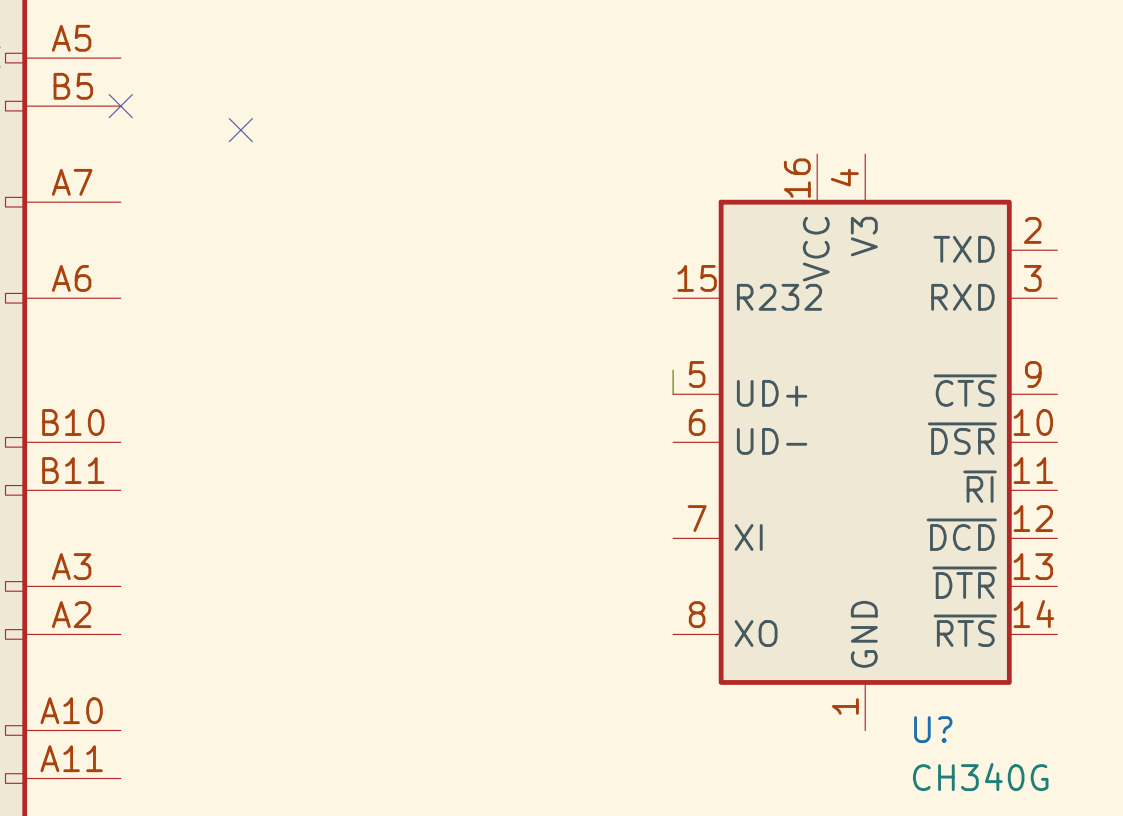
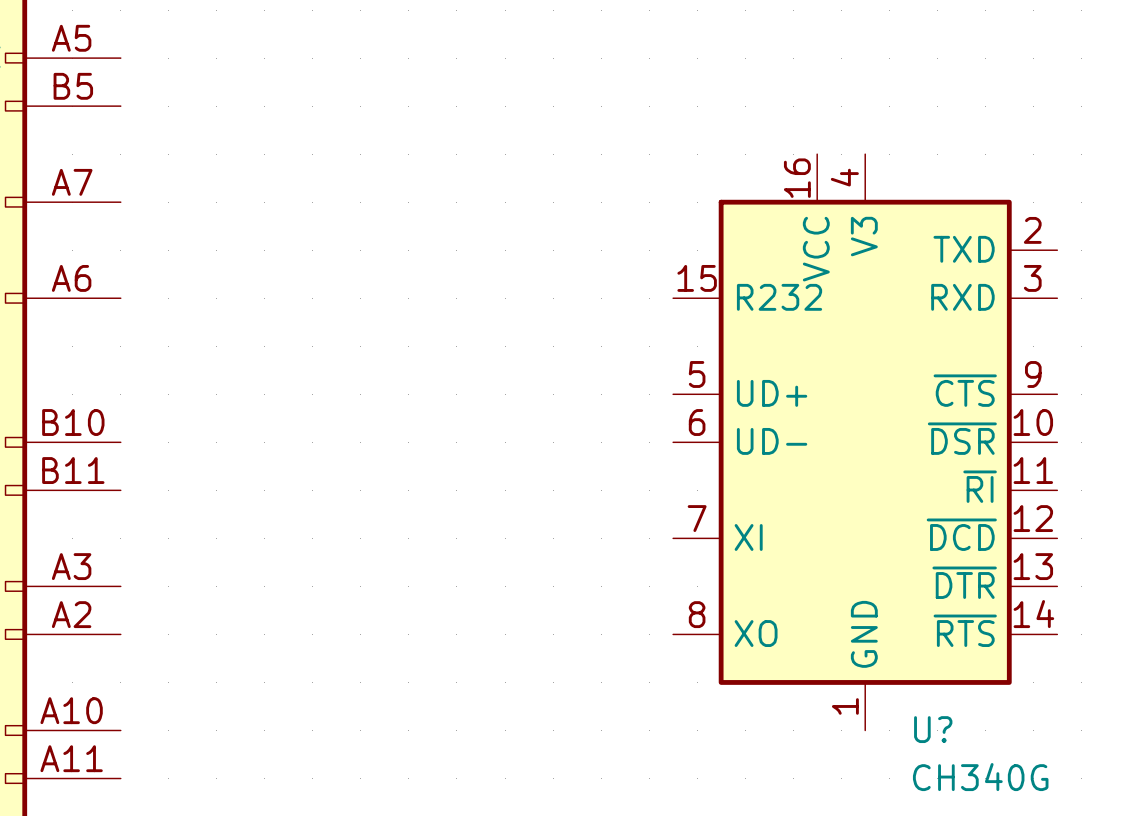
no-connect mark: (120, 106) -> none
no-connect mark: (240, 130) -> none
wire: (673, 370) (673, 394) -> none

